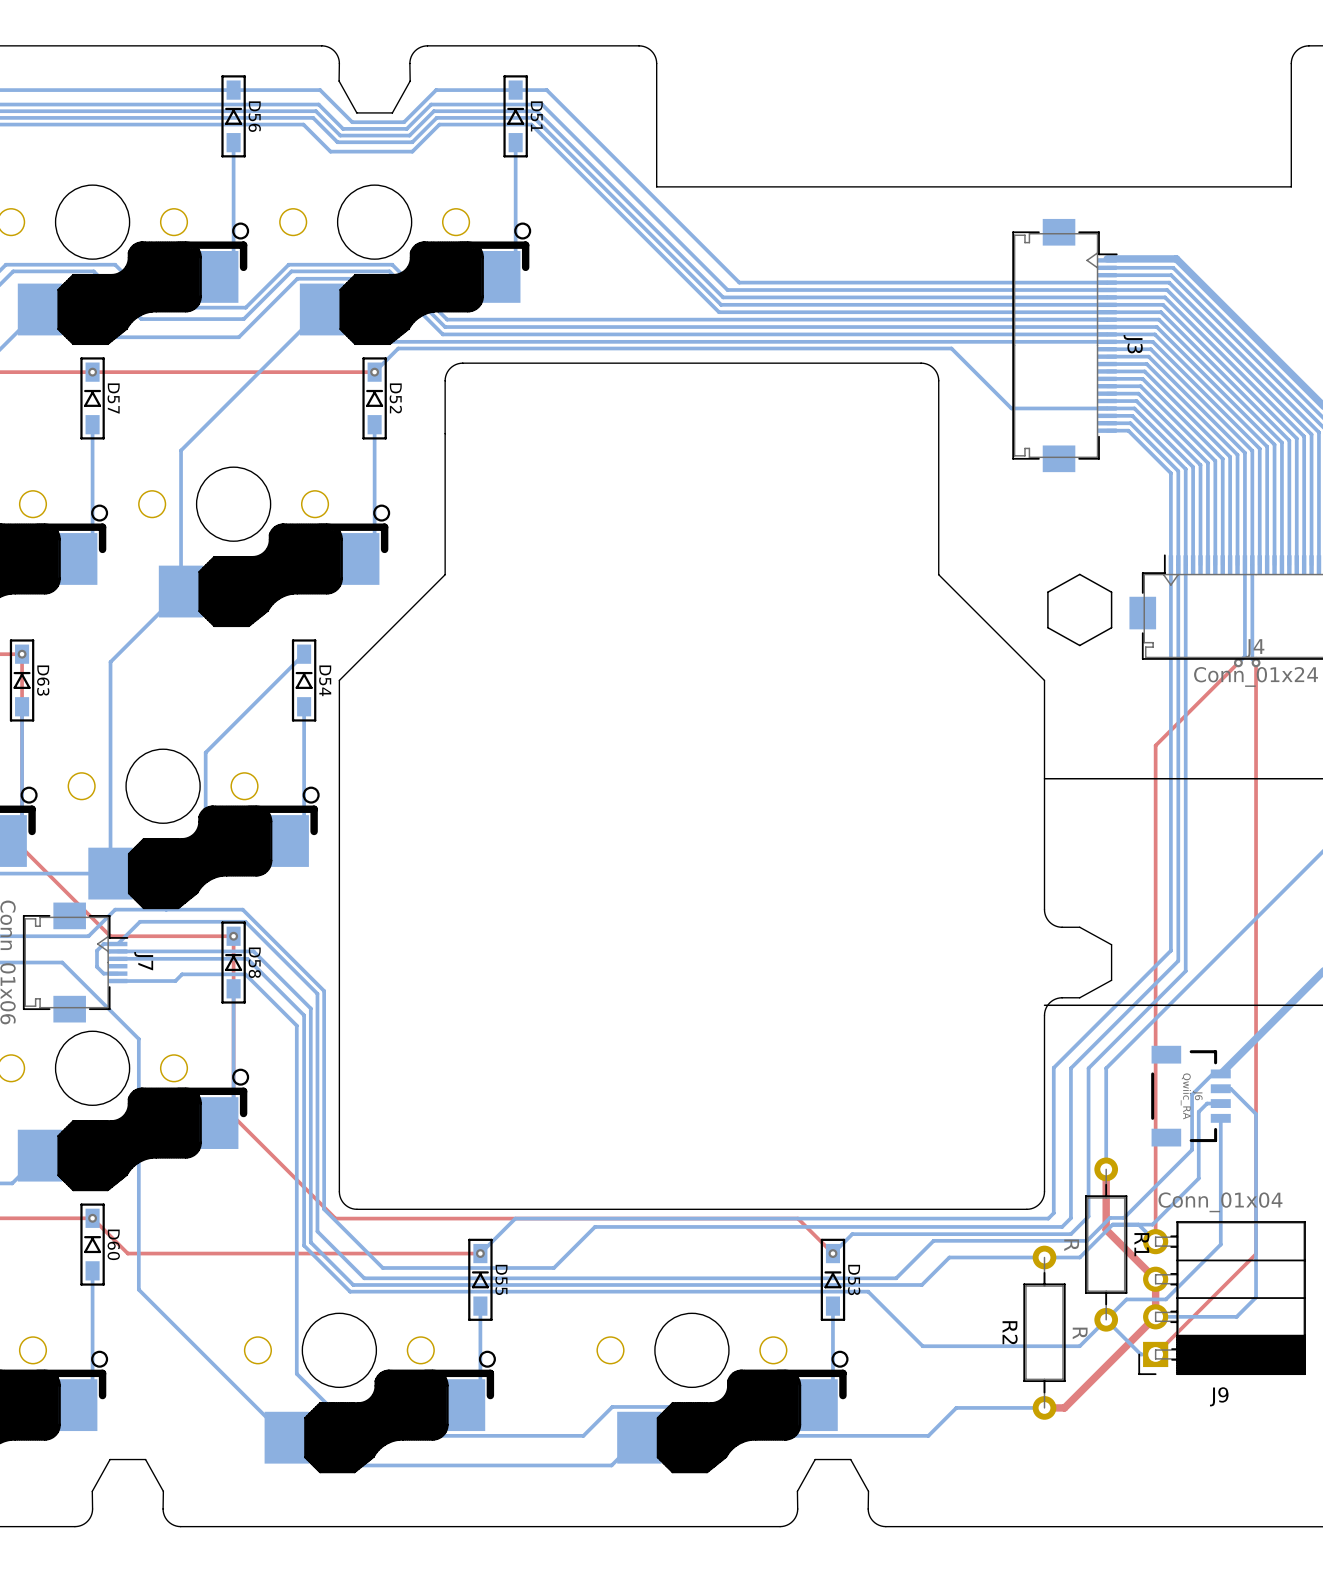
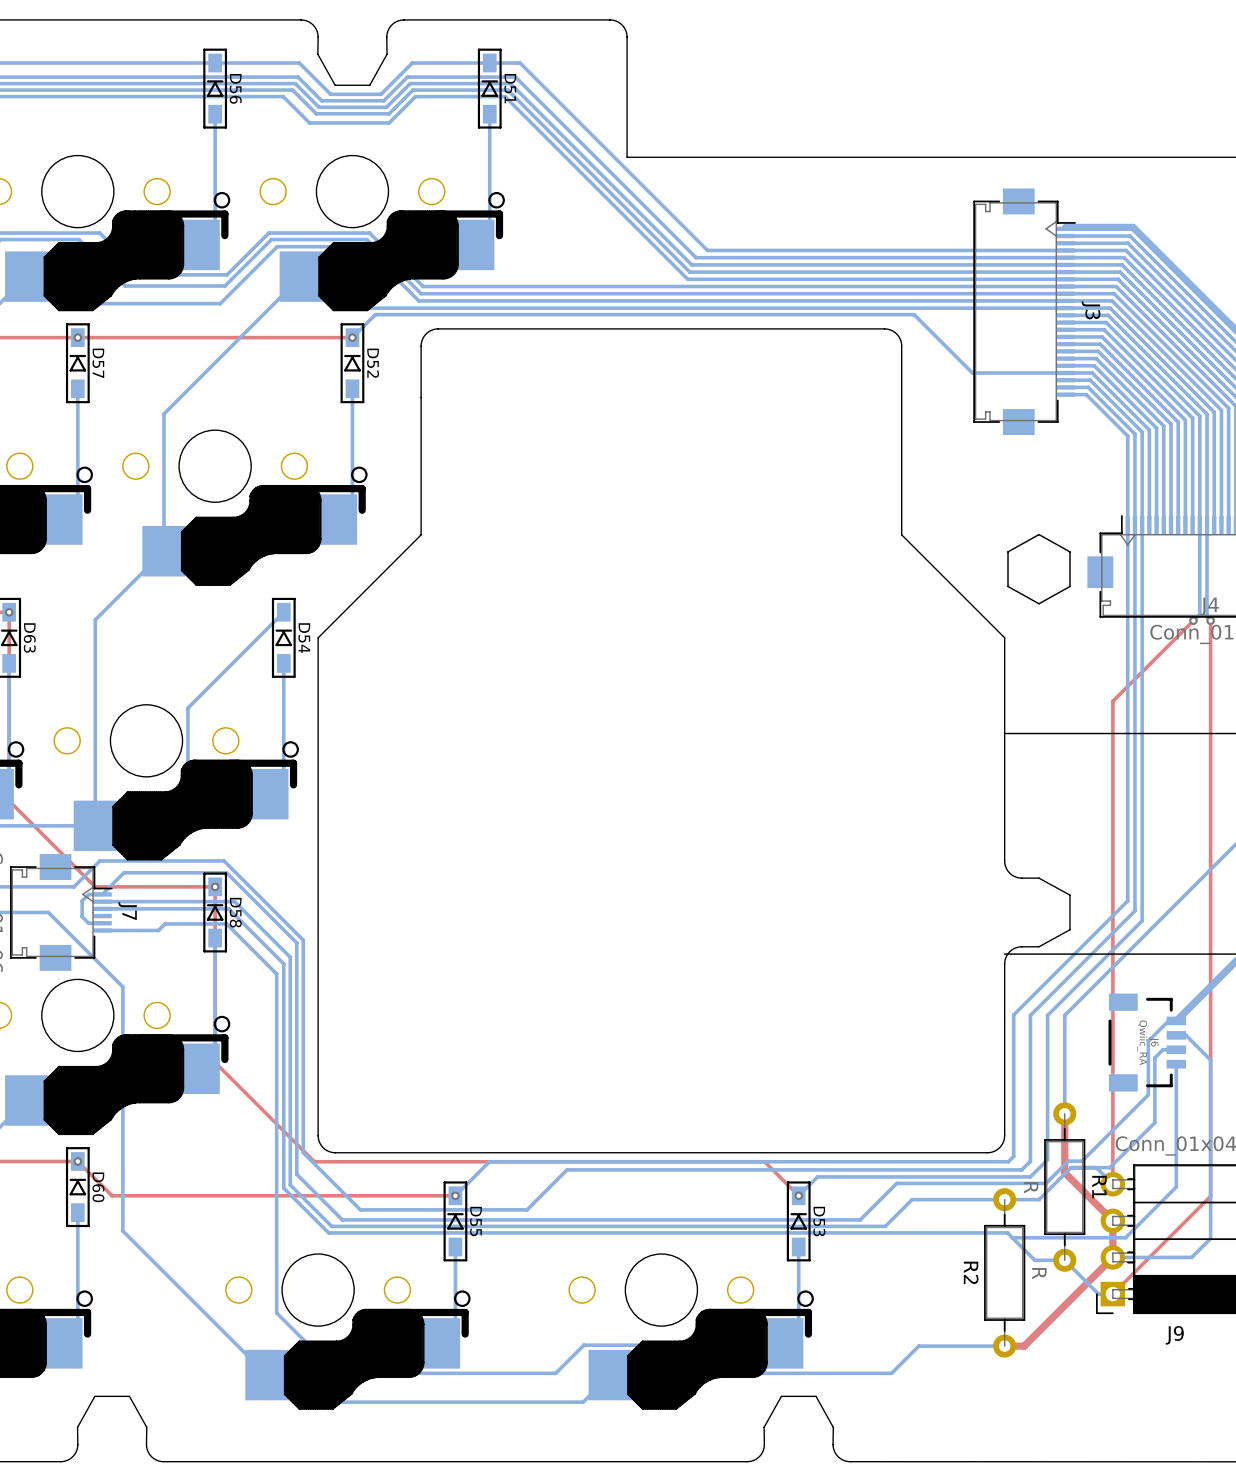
bottom track: (868, 1291) (922, 1346) (1079, 1346) (1126, 1299) (1165, 1299) (1168, 1296) -> (833, 1232) (1007, 1232) (1034, 1260) (1064, 1260)
bottom track: none -> (1125, 1237) (1012, 1237)

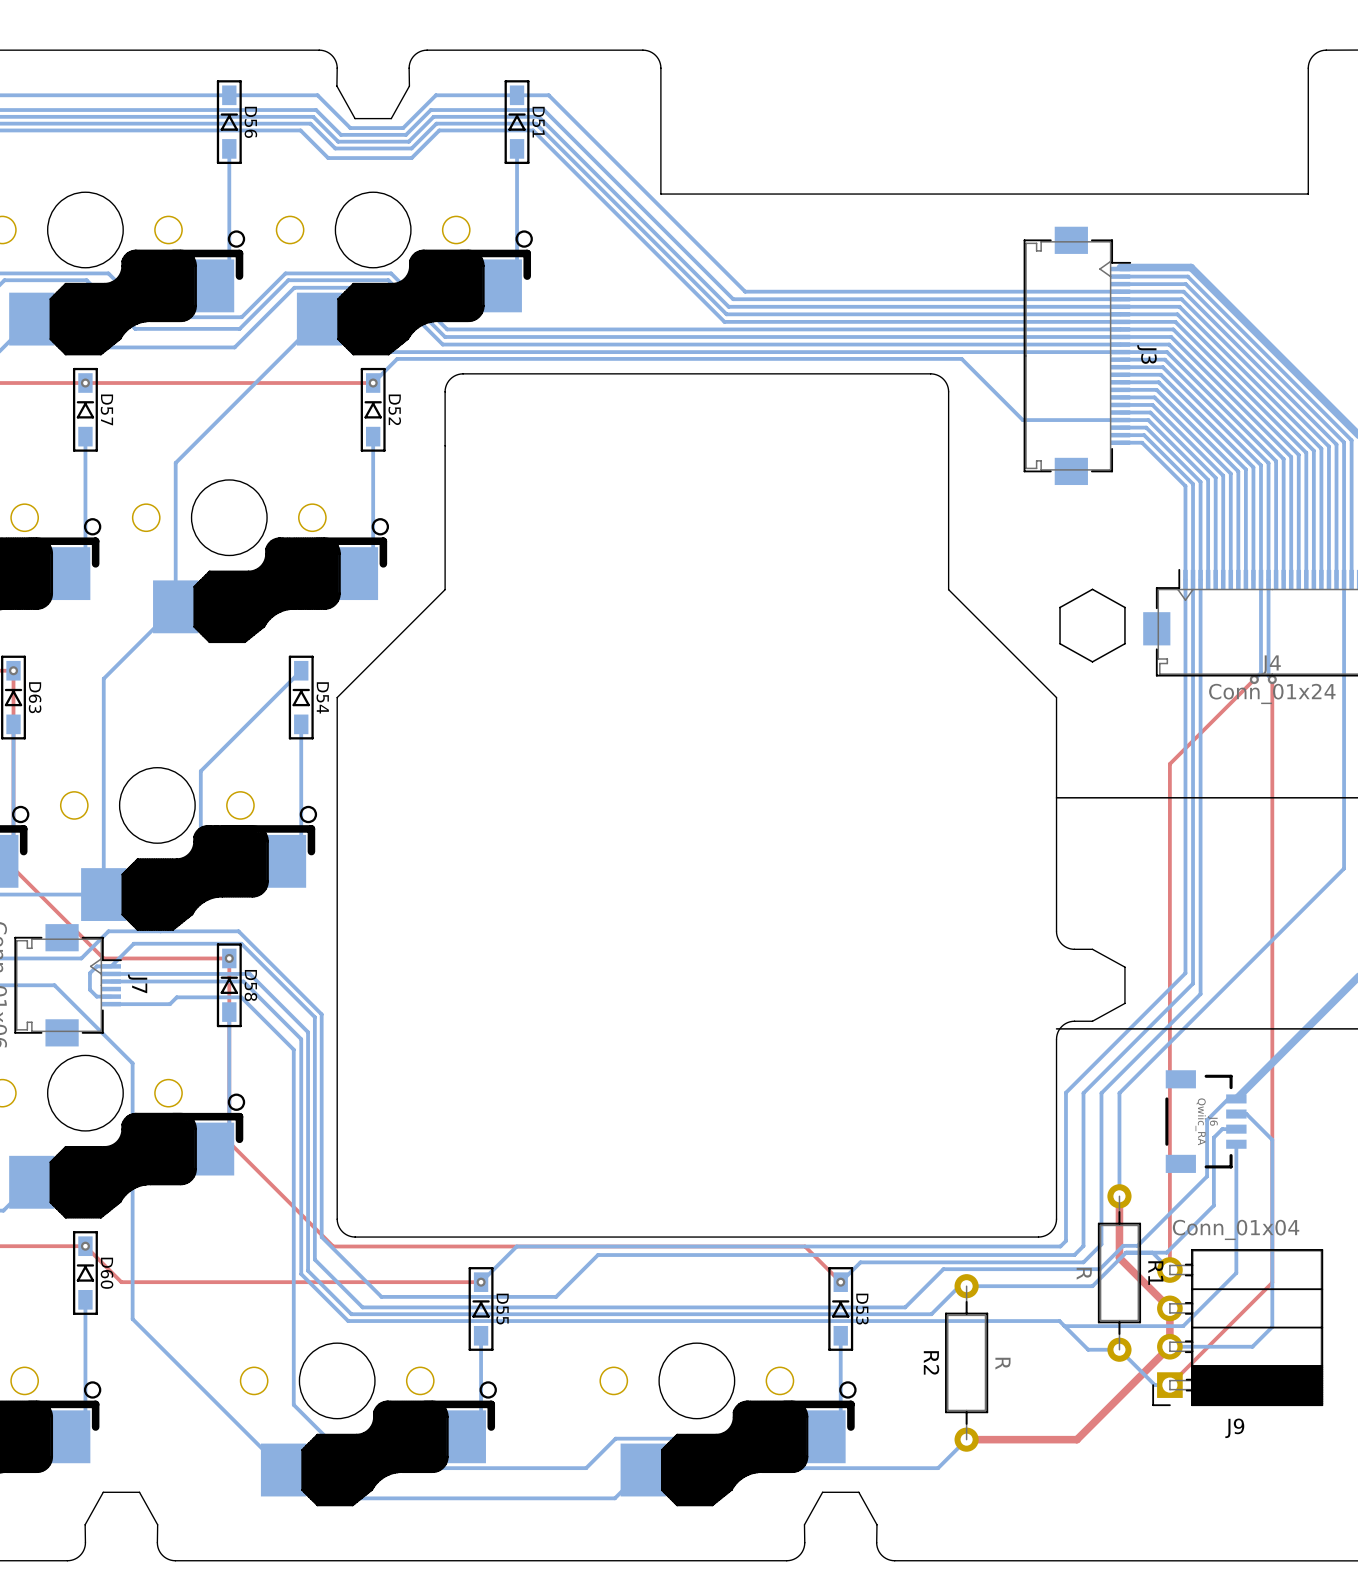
R2 position: (1004, 1272) -> (966, 1362)
bottom track: (1004, 1346) (918, 1346) -> none
top track: none -> (1056, 1439) (966, 1439)

